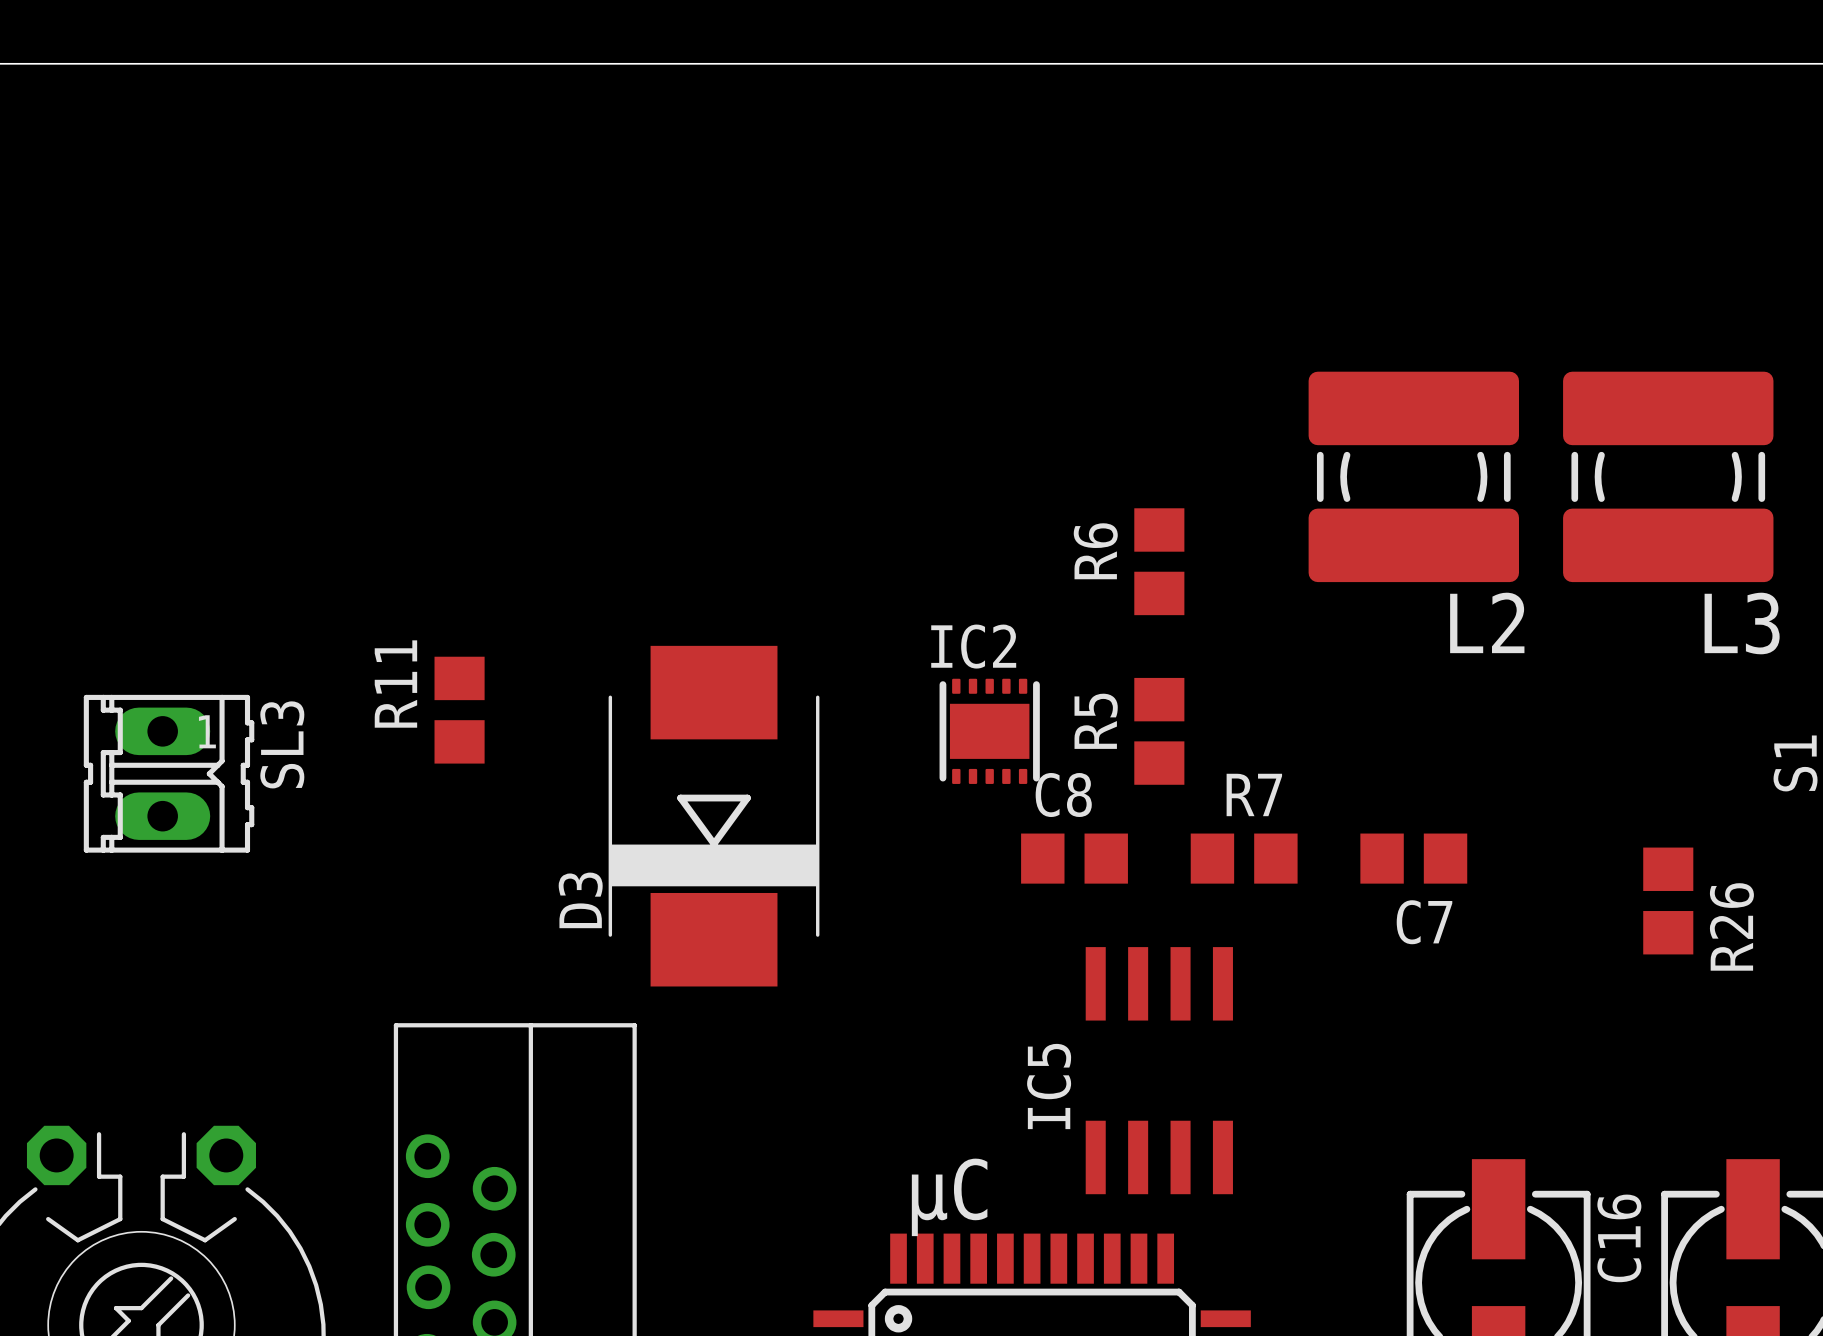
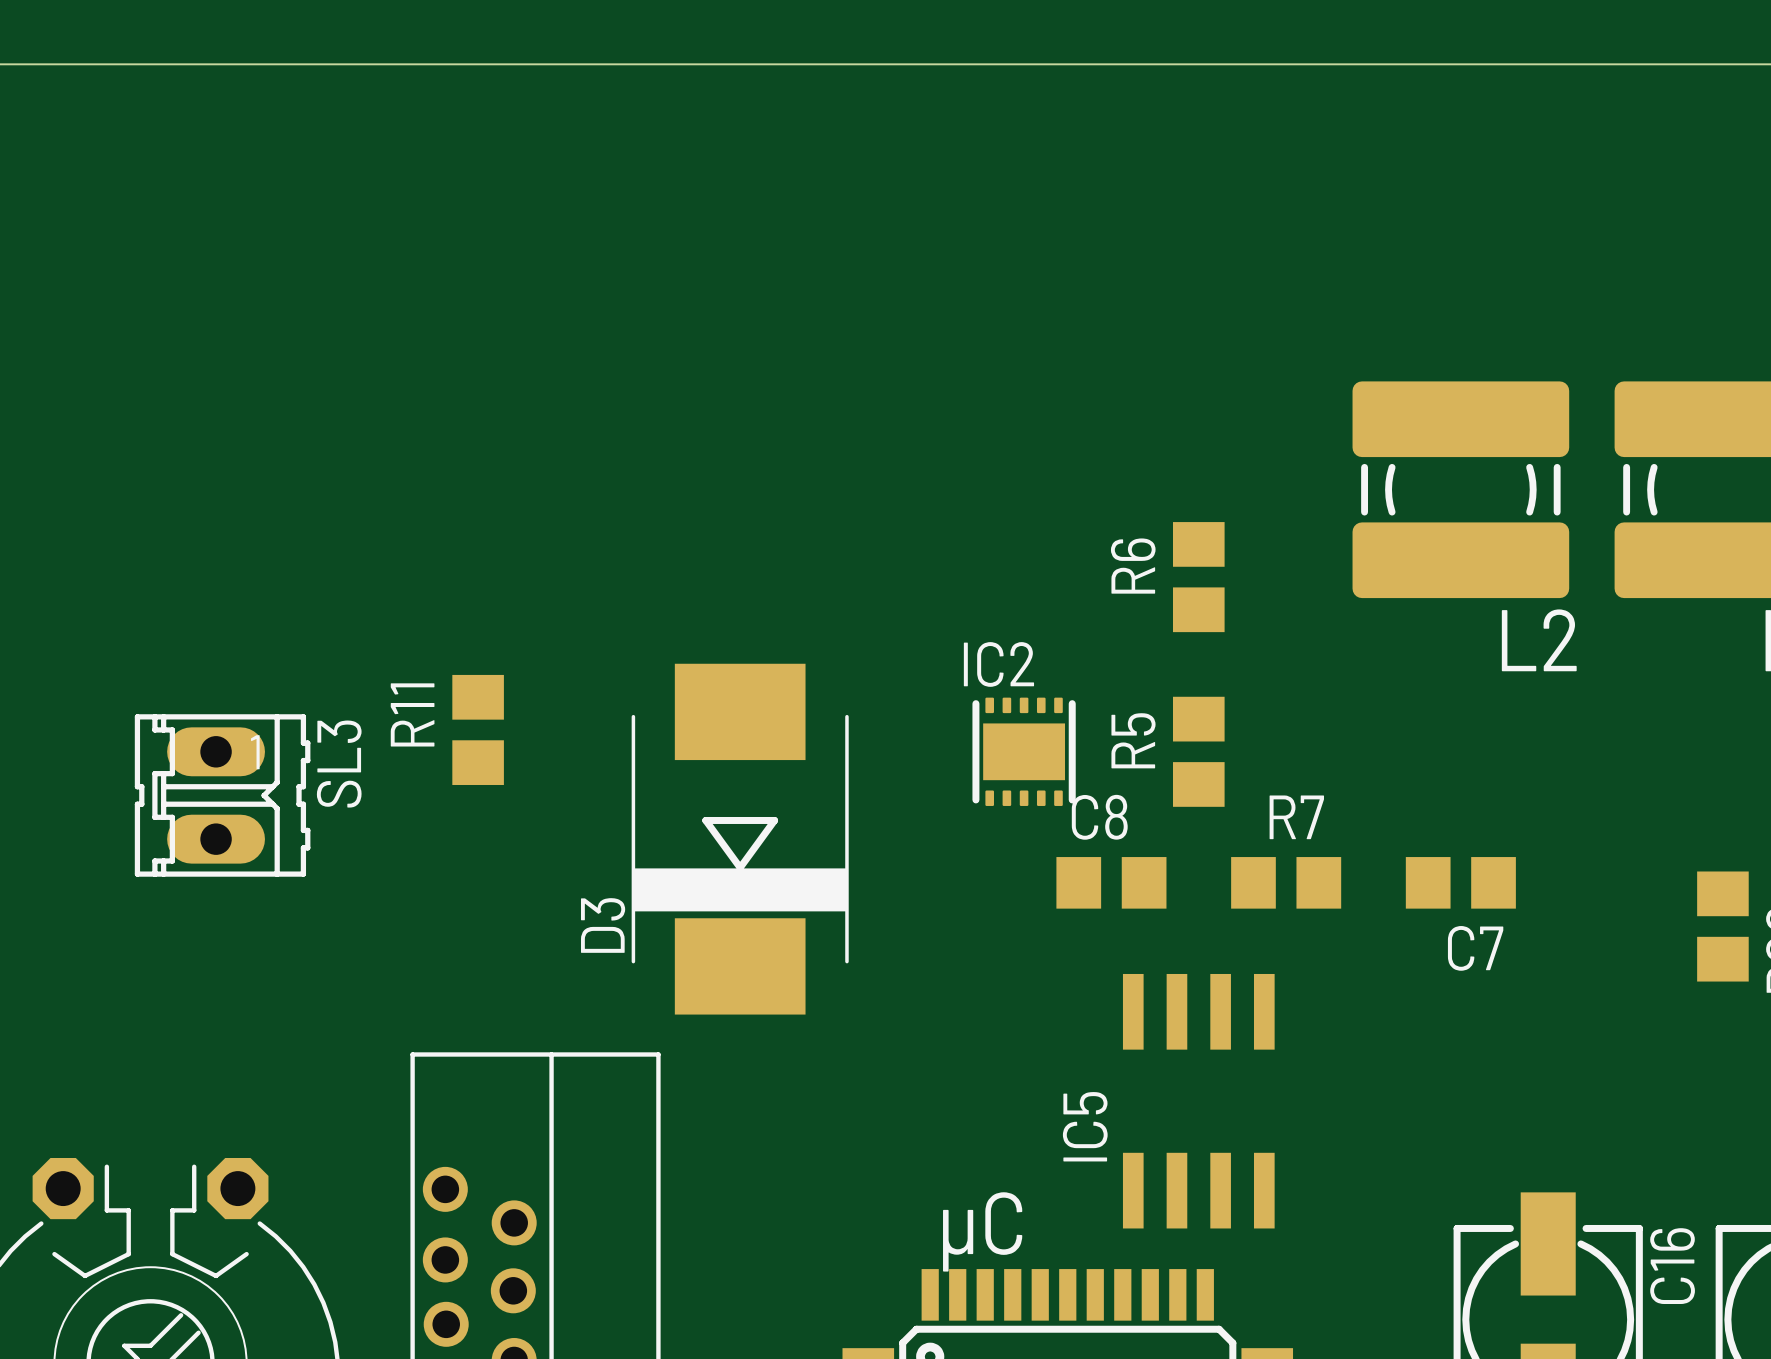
SL3 position: (169, 773) -> (222, 795)

